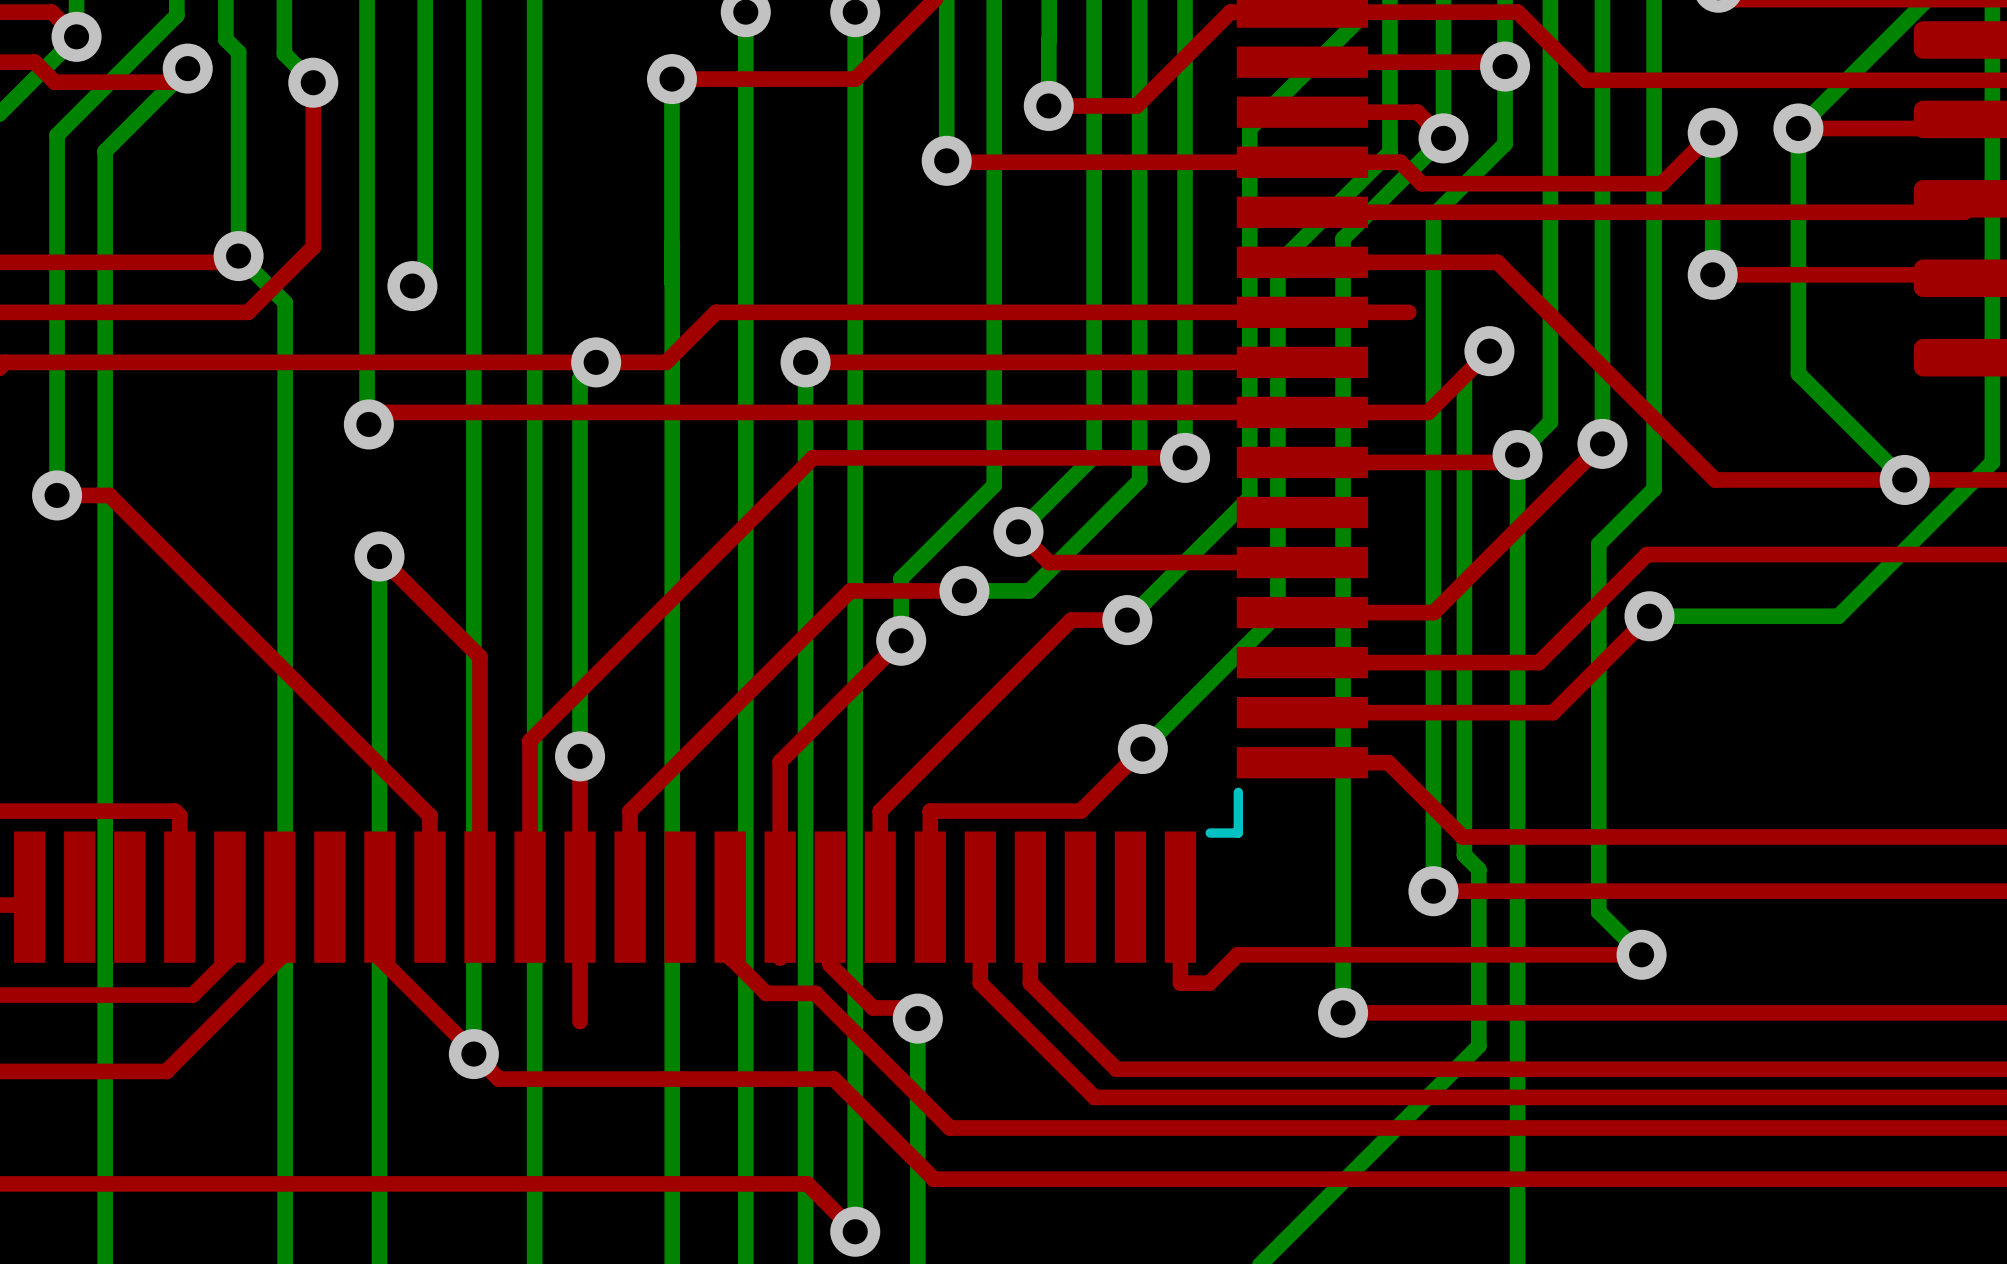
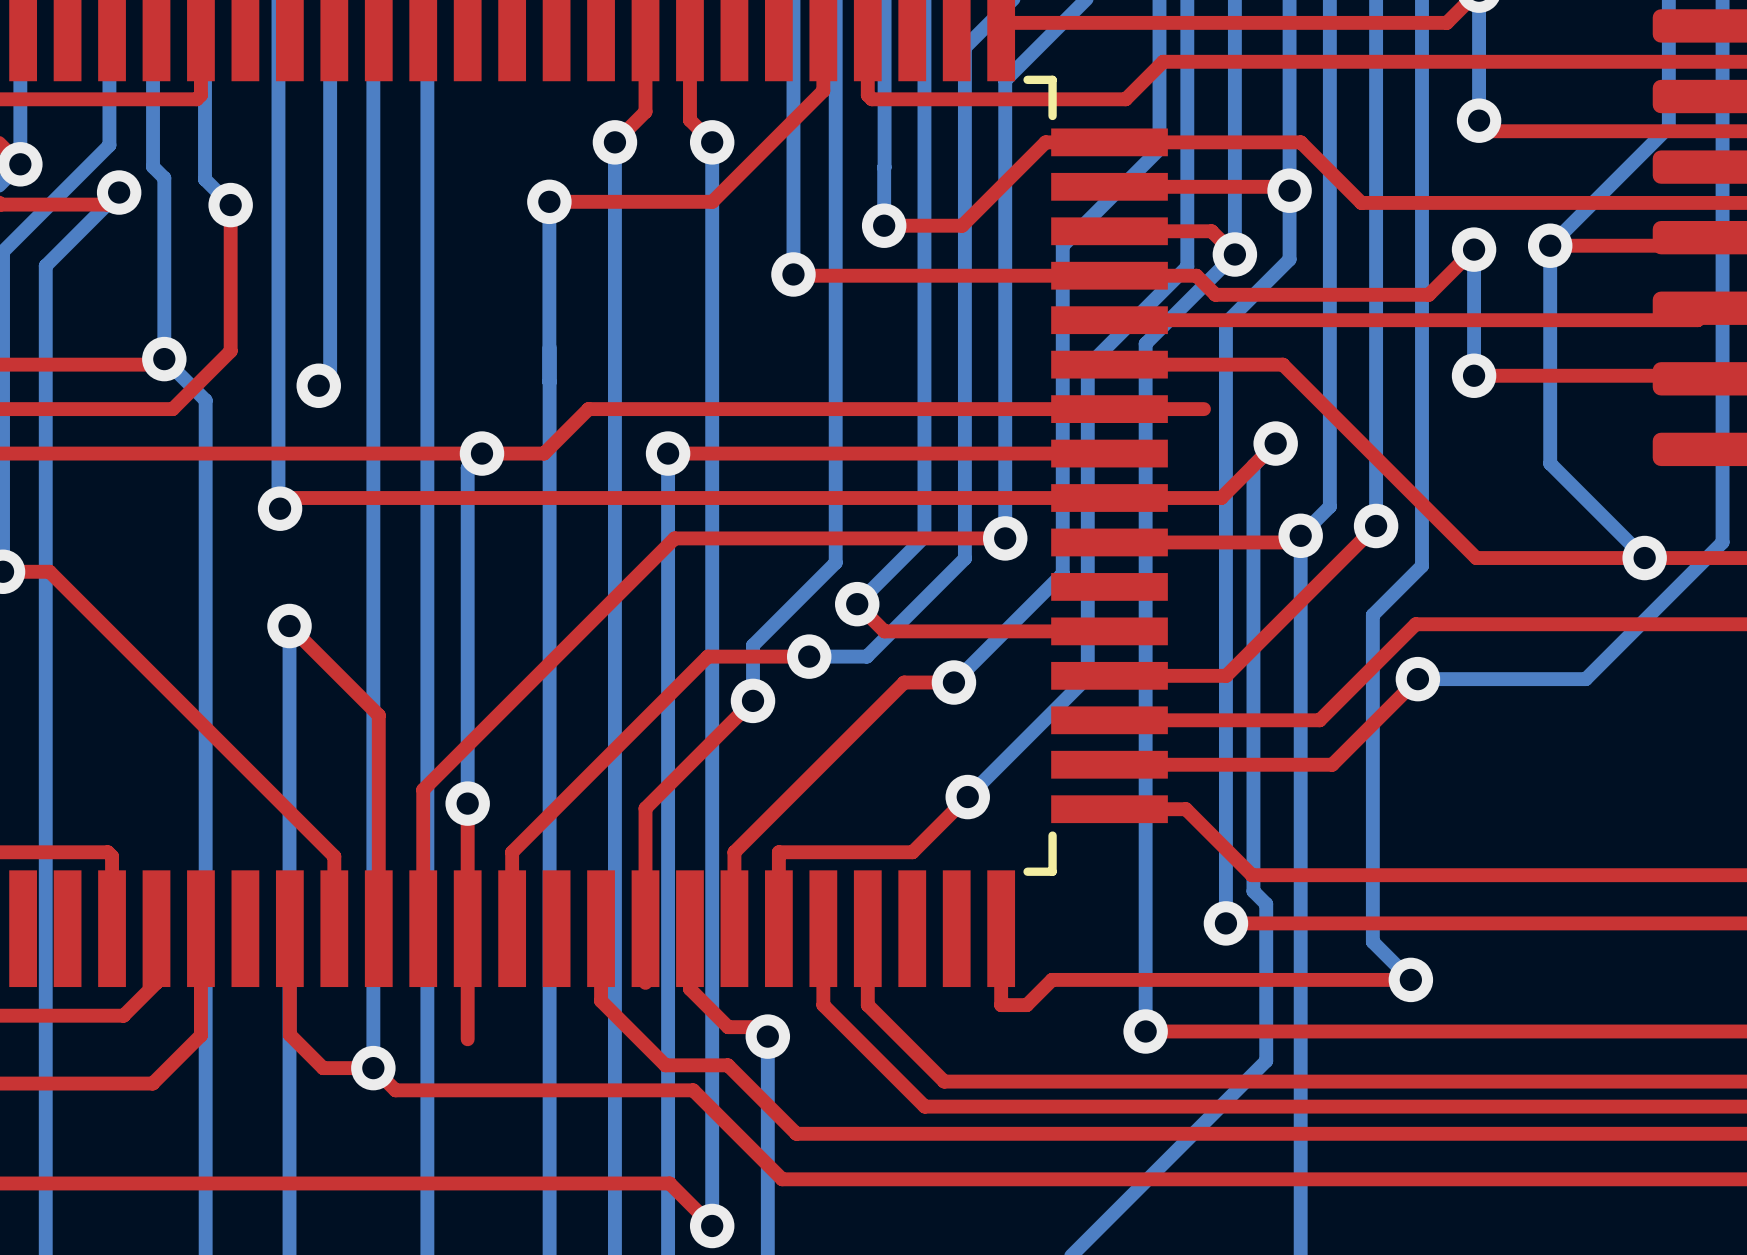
top track: (730, 957) (766, 993) (815, 993) (873, 1050) -> (601, 982) (601, 1000) (665, 1065) (727, 1065)
top track: (279, 958) (166, 1071) -> (200, 982) (200, 1035) (152, 1083) (100, 1083)
top track: (379, 958) (473, 1052) -> (289, 982) (289, 1034) (323, 1068) (373, 1068)

